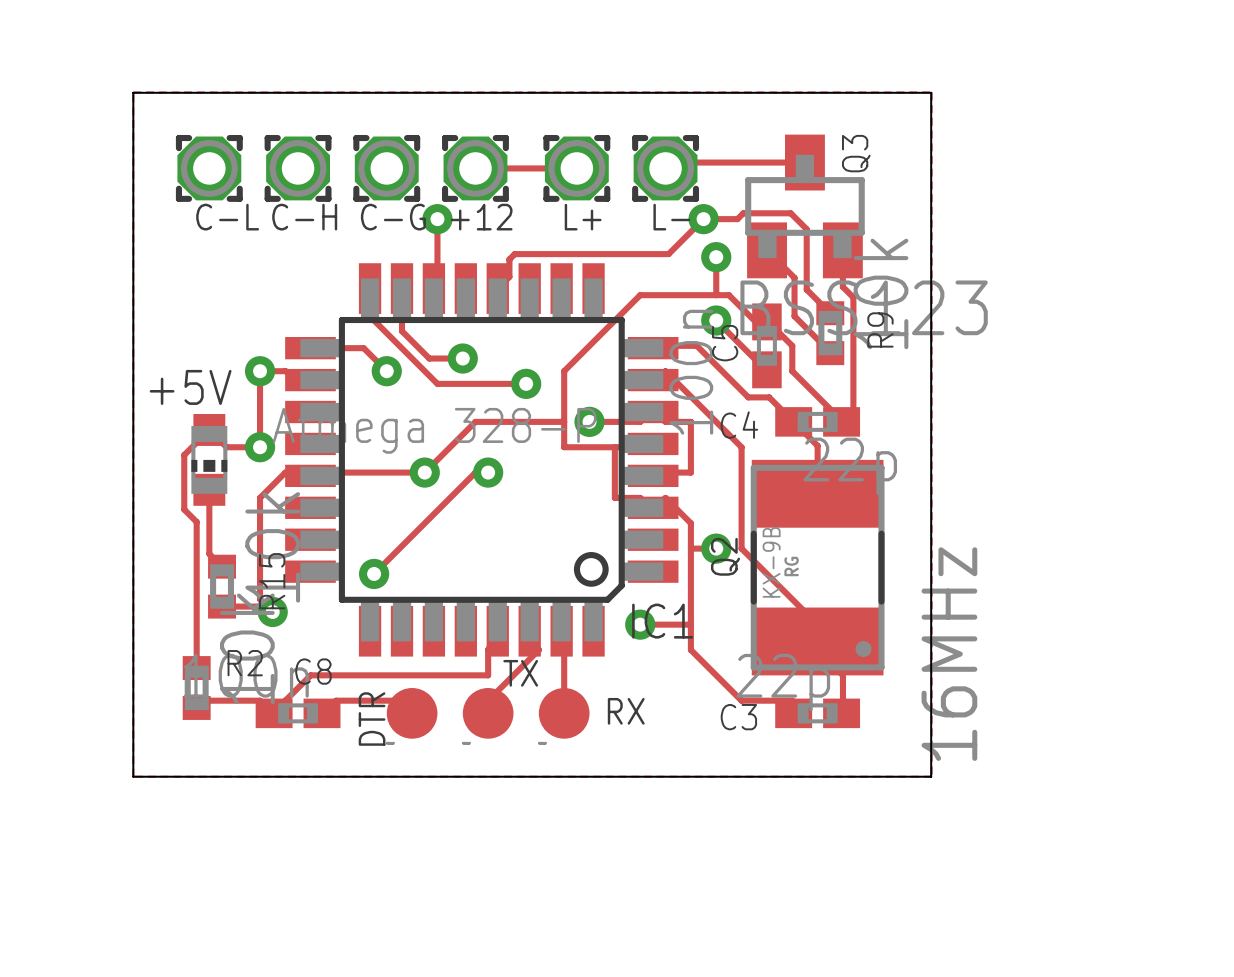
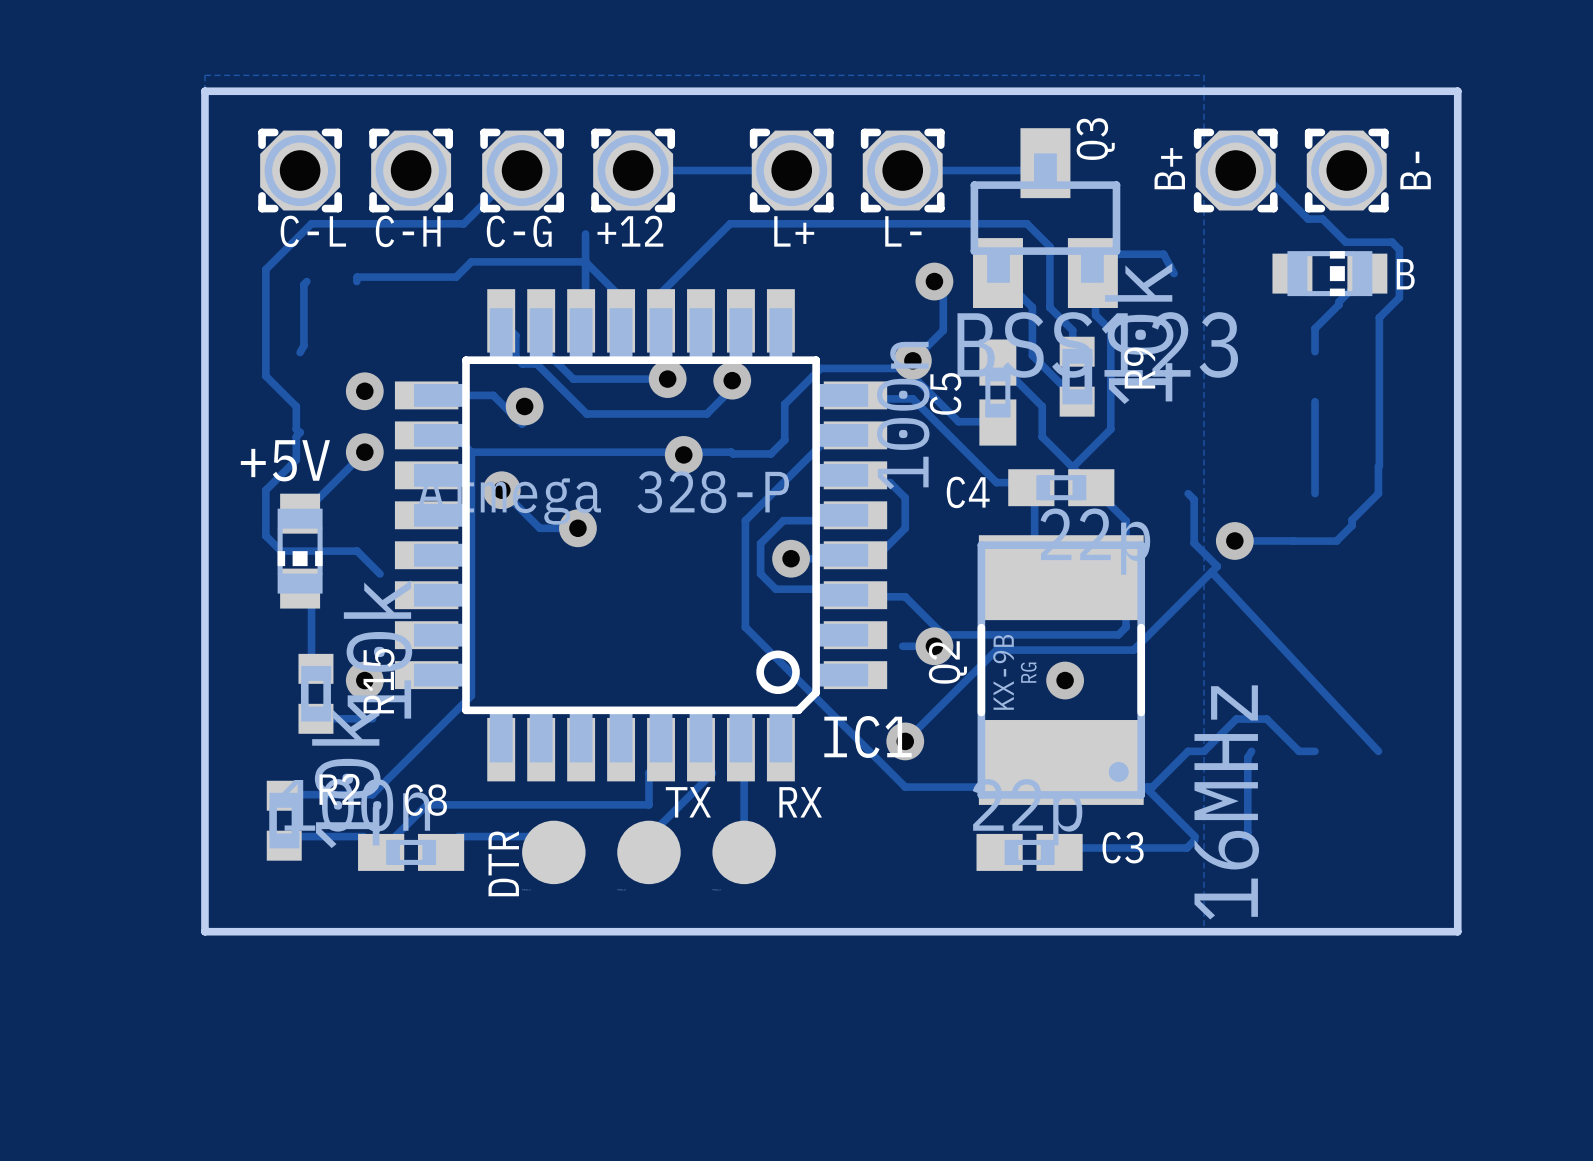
board edge: (133, 105) (133, 92) (931, 92) (931, 776) -> (204, 91) (1457, 91) (1457, 931) (1203, 931)
board edge width: thin (133, 105) (133, 776) (931, 776) -> thick (204, 91) (204, 931) (1203, 931)
Q3 name position: Q3 (856, 153) -> Q3 (1095, 139)
track: (804, 162) (671, 162) (665, 168) -> (1045, 163) (1042, 170) (902, 170)
track: none -> (522, 170) (517, 170) (463, 223) (311, 223) (265, 269) (265, 376) (296, 406) (296, 429) (300, 432) (296, 436) (296, 459) (265, 490) (265, 535) (281, 551) (357, 551) (380, 573)
L+ position: (576, 168) -> (791, 170)
L- position: (665, 168) -> (902, 170)
track: none -> (1235, 170) (1259, 170) (1308, 219) (1322, 219) (1345, 242) (1392, 242) (1399, 249) (1399, 297) (1379, 317) (1378, 493) (1352, 519) (1352, 525) (1336, 541) (1234, 540)
B+: none -> (1235, 170)
B-: none -> (1346, 170)
via: (437, 219) -> none
via: (703, 219) -> none
track: none -> (943, 269) (943, 330) (905, 368)
track: (842, 250) (842, 286) (853, 297) (853, 410) (841, 421) (844, 423) (838, 417) -> (943, 634) (1118, 634) (1126, 627) (1126, 520) (1087, 482)
track: none -> (1174, 273) (1163, 254) (1110, 254) (1092, 273) (1095, 277) (1095, 315) (1110, 330) (1110, 429) (1072, 467)
B: none -> (1329, 273)
track: none -> (1367, 273) (1315, 328) (1315, 351)
track: none -> (306, 281) (303, 284) (303, 345) (300, 352)
track: none -> (356, 281) (357, 277) (456, 277) (471, 261) (585, 261) (616, 292) (616, 315) (621, 320)
track: (716, 257) (716, 295) -> none
track: (370, 288) (370, 316) (437, 383) (526, 383) -> (501, 320) (515, 335) (515, 357) (522, 364) (536, 364) (586, 413) (706, 413) (732, 388) (732, 380)
track: (401, 288) (401, 331) (429, 358) (462, 358) -> (541, 320) (547, 322) (547, 353) (573, 379) (667, 379)
track: (497, 288) (509, 276) (509, 259) (514, 254) (668, 254) (703, 219) (737, 219) (743, 213) (790, 213) (806, 229) (806, 289) (830, 313) -> (661, 320) (661, 292) (730, 223) (1027, 223) (1049, 246) (1049, 307) (1072, 330) (1072, 345) (1077, 351)
track: (716, 320) (766, 369) -> (905, 368) (958, 421) (997, 422)
via position: (716, 320) -> (912, 360)
track: none -> (905, 368) (820, 368) (784, 404) (784, 440) (770, 453) (733, 453) (731, 452) (471, 452)
via: none -> (667, 379)
via: none -> (732, 380)
via: none -> (364, 391)
track: (653, 348) (665, 345) (696, 345) (748, 397) (769, 397) (817, 445) (817, 493) -> (855, 395) (859, 398) (912, 398) (996, 482) (1027, 482) (1034, 490) (1034, 573) (1029, 577)
track: none -> (1315, 401) (1315, 493)
via: (462, 358) -> none
via: (260, 371) -> none
via position: (386, 371) -> (524, 406)
track: (310, 380) (285, 371) (260, 371) (260, 447) (226, 447) (209, 429) (184, 455) (184, 509) (196, 522) (196, 668) -> (471, 452) (471, 695) (372, 794) (284, 795)
track: (653, 380) (665, 371) (741, 447) (741, 548) (817, 624) (817, 649) (842, 675) (841, 713) -> (855, 435) (829, 436) (745, 520) (745, 627) (905, 787) (1004, 787)
track: (802, 381) (792, 371) (792, 345) (766, 320) (755, 321) (728, 295) (640, 295) (564, 371) (564, 447) (640, 447) (653, 443) -> (1042, 436) (1042, 406) (997, 362)
via position: (526, 383) -> (683, 454)
track: none -> (364, 452) (303, 513) (300, 513)
via: none -> (364, 452)
track: (564, 421) (475, 421) (424, 472) (310, 472) (310, 475) (285, 472) (260, 497) (260, 599) (272, 611) -> none
track: (589, 421) (640, 421) (653, 412) (665, 421) (690, 421) (690, 472) (674, 472) -> (855, 475) (859, 482) (890, 482) (905, 497) (905, 528) (882, 551)
via: (589, 421) -> none
track: none -> (501, 490) (539, 528) (577, 528)
via: none -> (501, 490)
track: none -> (1188, 493) (1194, 499) (1194, 543) (1217, 566) (1133, 650) (996, 650) (905, 741)
track: none -> (855, 515) (851, 520) (783, 520) (760, 543) (760, 573) (775, 589) (851, 589) (855, 595) (859, 596) (905, 596) (943, 634)
via: (260, 447) -> none
track: (614, 447) (614, 497) (640, 497) (653, 507) (665, 497) (690, 523) (690, 649) (741, 700) (792, 700) (793, 713) -> none
+5V position: (209, 459) -> (300, 551)
via: none -> (1234, 540)
via position: (424, 472) -> (577, 528)
track: (488, 472) (475, 472) (374, 573) -> none
via: (488, 472) -> none
via: none -> (791, 558)
track: (209, 489) (209, 554) (222, 566) -> (300, 588) (303, 589) (311, 596) (311, 665) (315, 668)
track: none -> (1211, 572) (1378, 751)
via: (374, 573) -> none
via: none -> (1065, 680)
via position: (272, 611) -> (364, 680)
track: (640, 624) (690, 624) -> none
via position: (640, 624) -> (905, 741)
track: none -> (1251, 751) (1247, 757) (1247, 832) (1244, 836)
track: none -> (1315, 751) (1299, 751) (1266, 719) (1236, 719) (1204, 751) (1188, 751) (1152, 787) (1146, 787) (1194, 836) (1194, 840) (1186, 847) (1065, 847) (1059, 852)
RX name position: RX (626, 711) -> RX (800, 802)
C3 position: (817, 713) -> (1029, 852)
C3 name position: C3 (738, 717) -> C3 (1123, 847)

